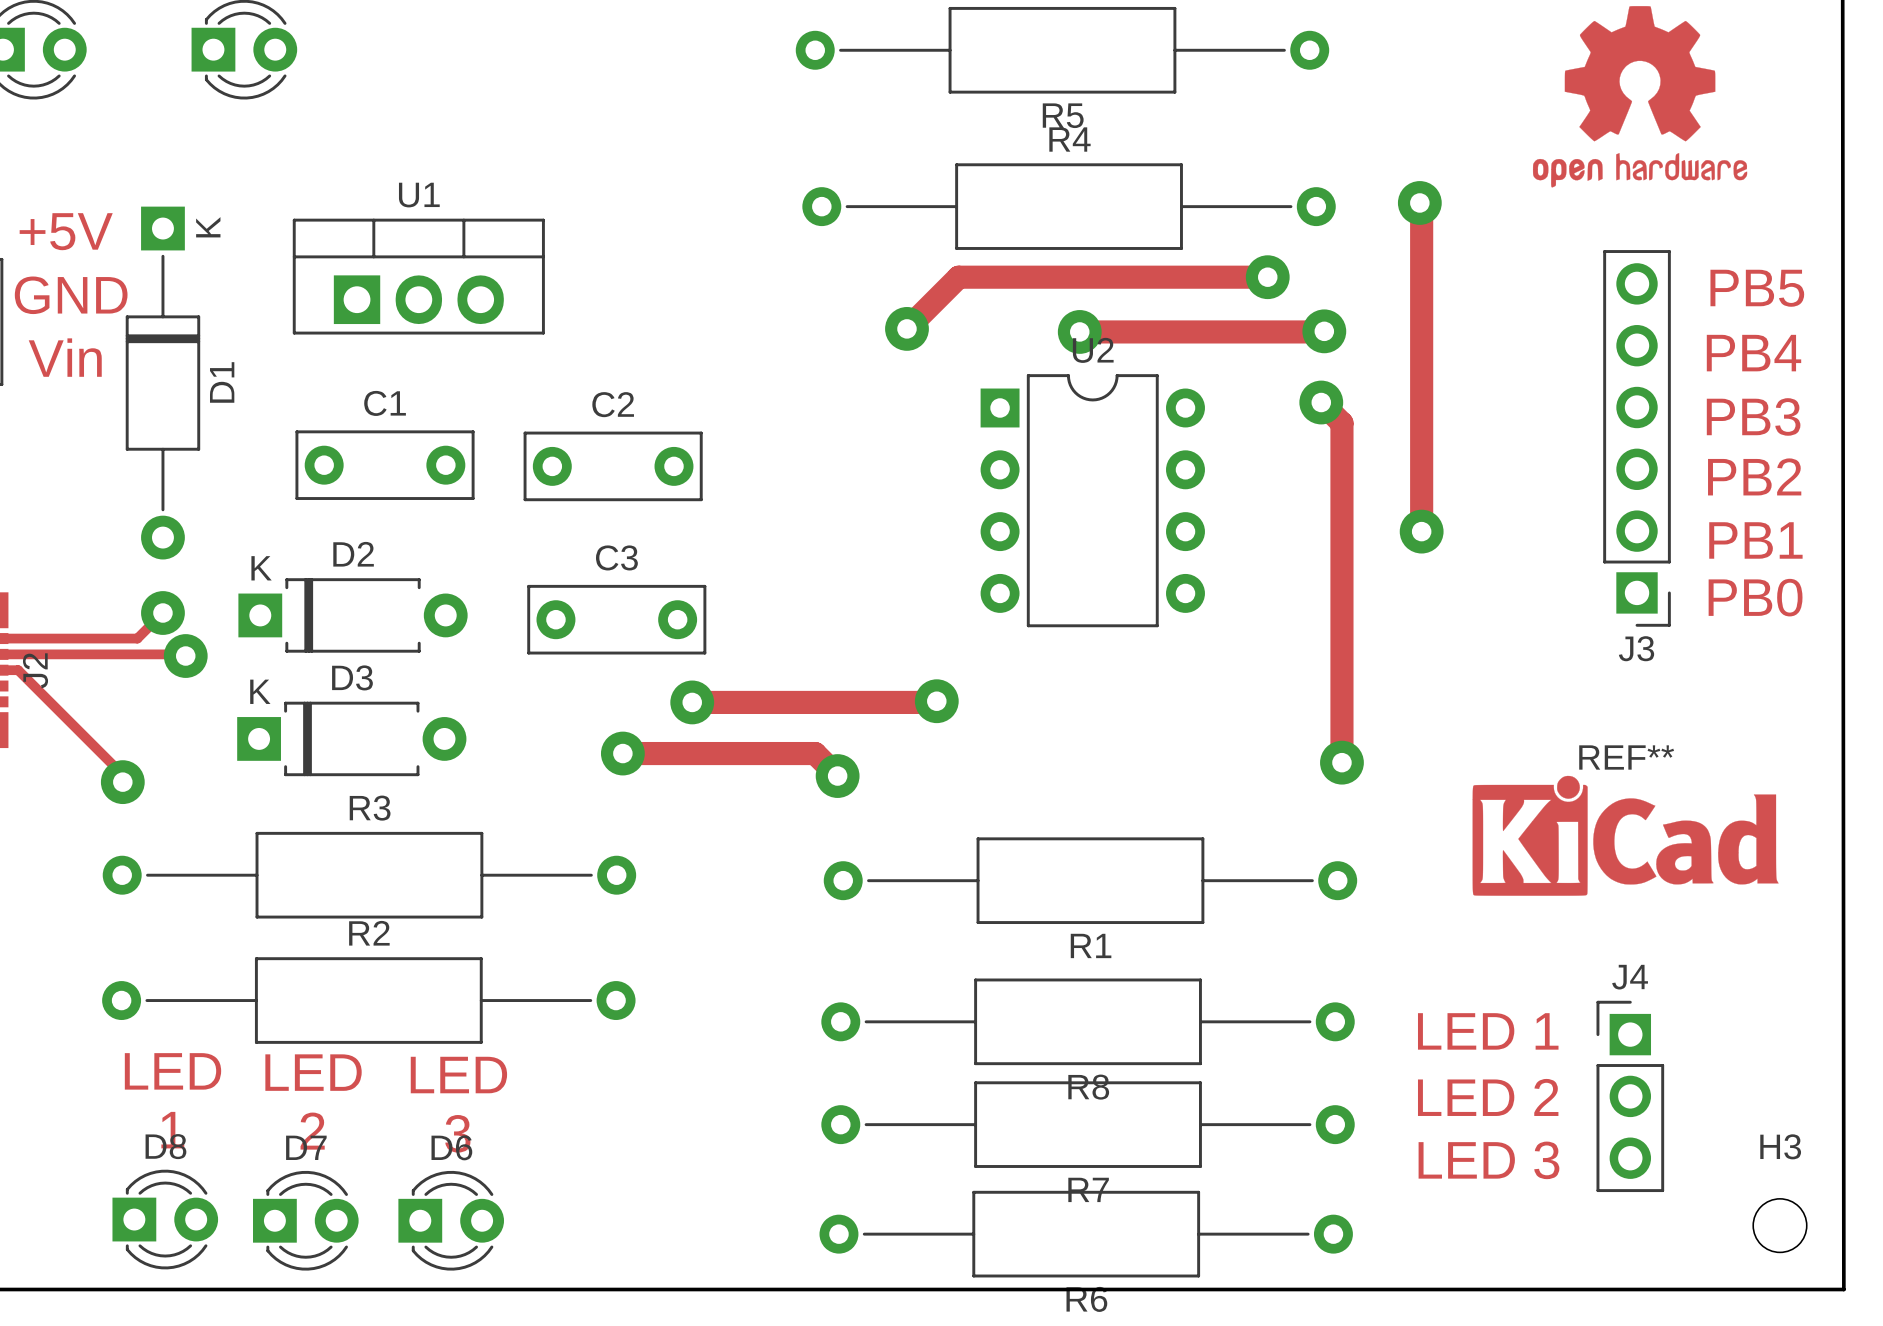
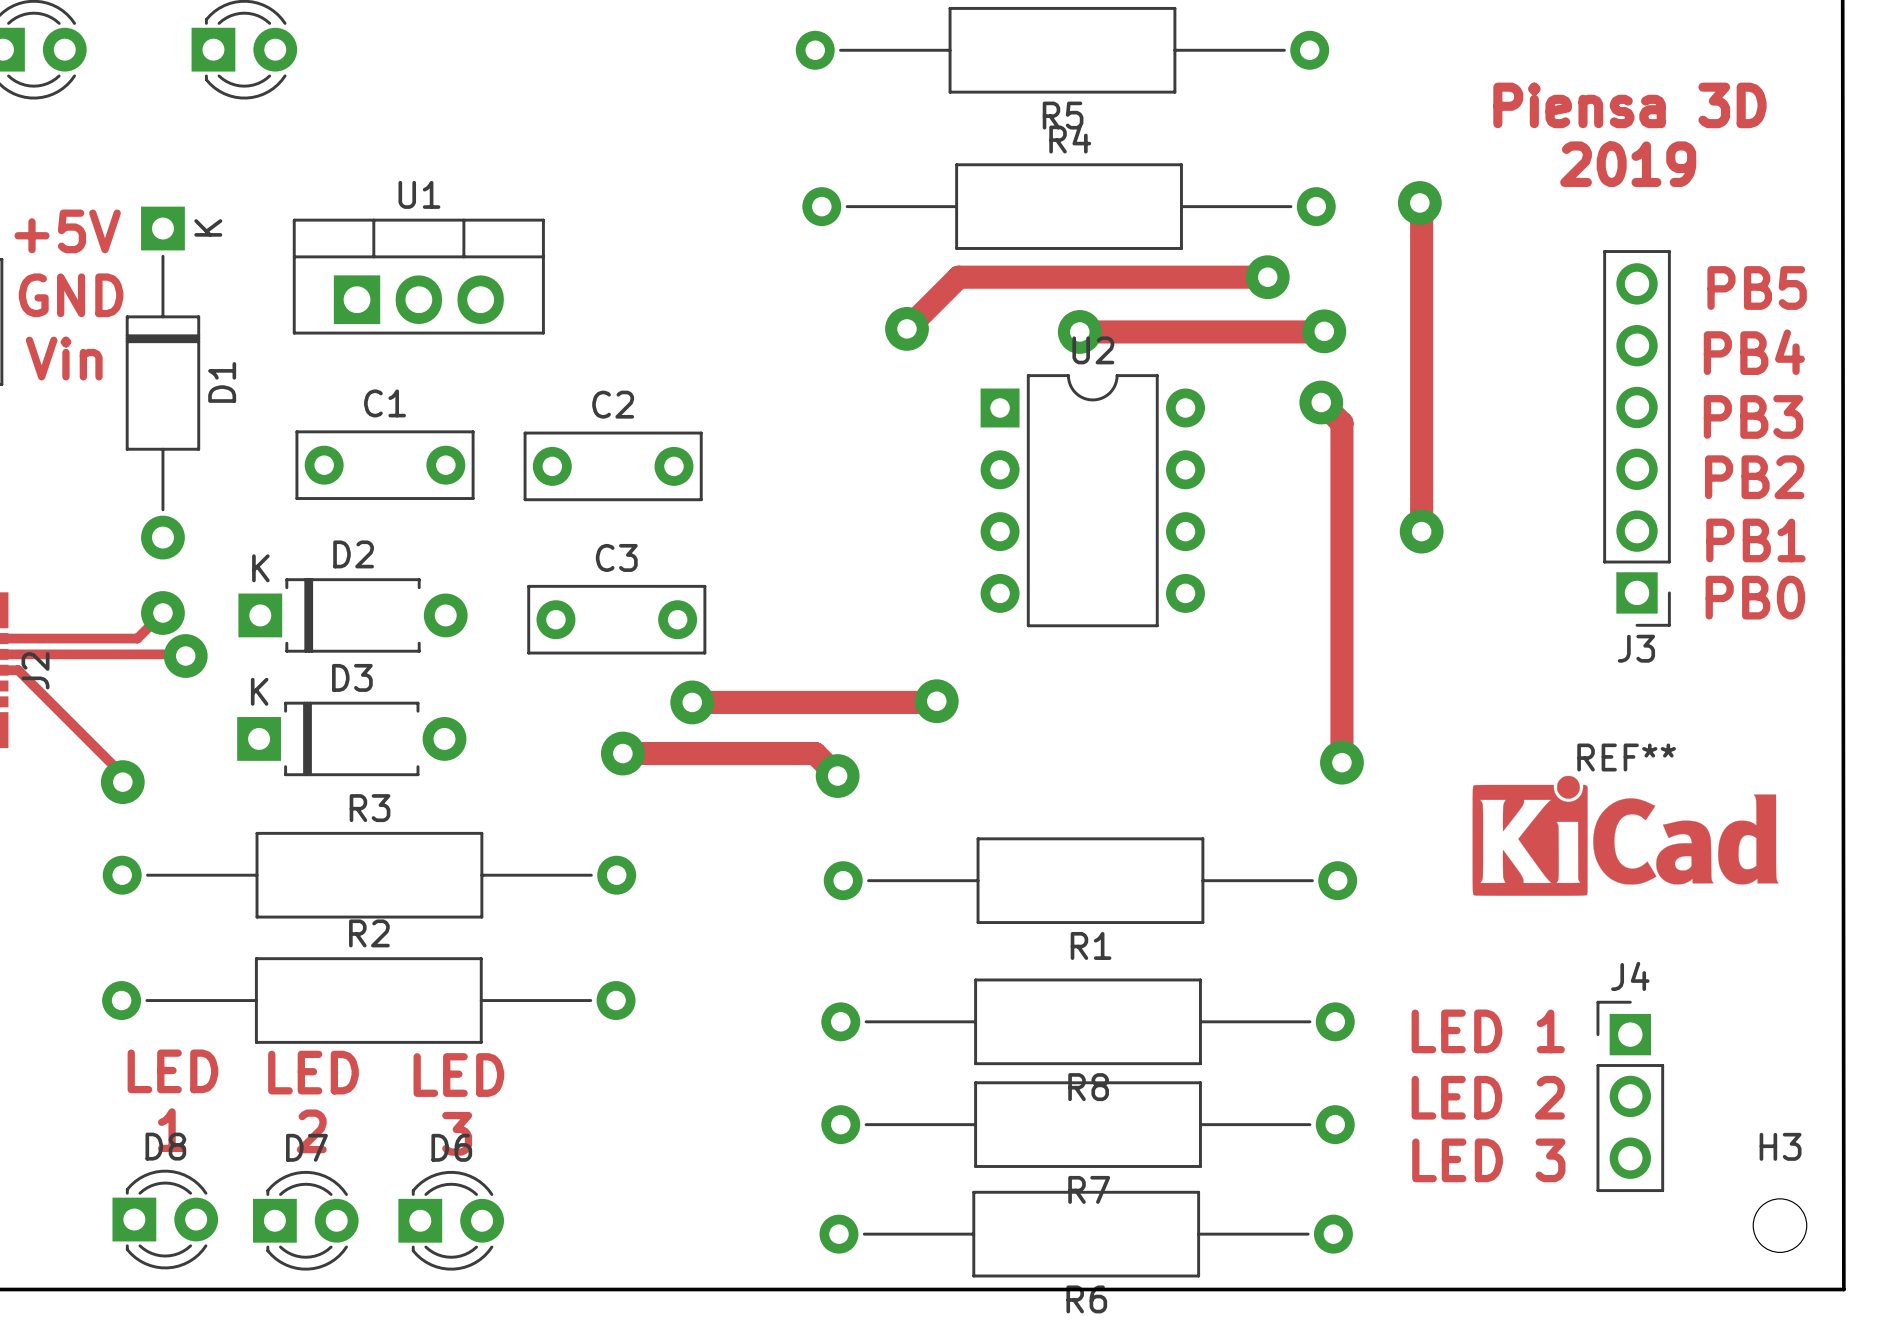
drawing: [1532, 6, 1748, 188] -> none
text: none -> Piensa 3D (1629, 105)
text: none -> 2019 (1628, 164)

